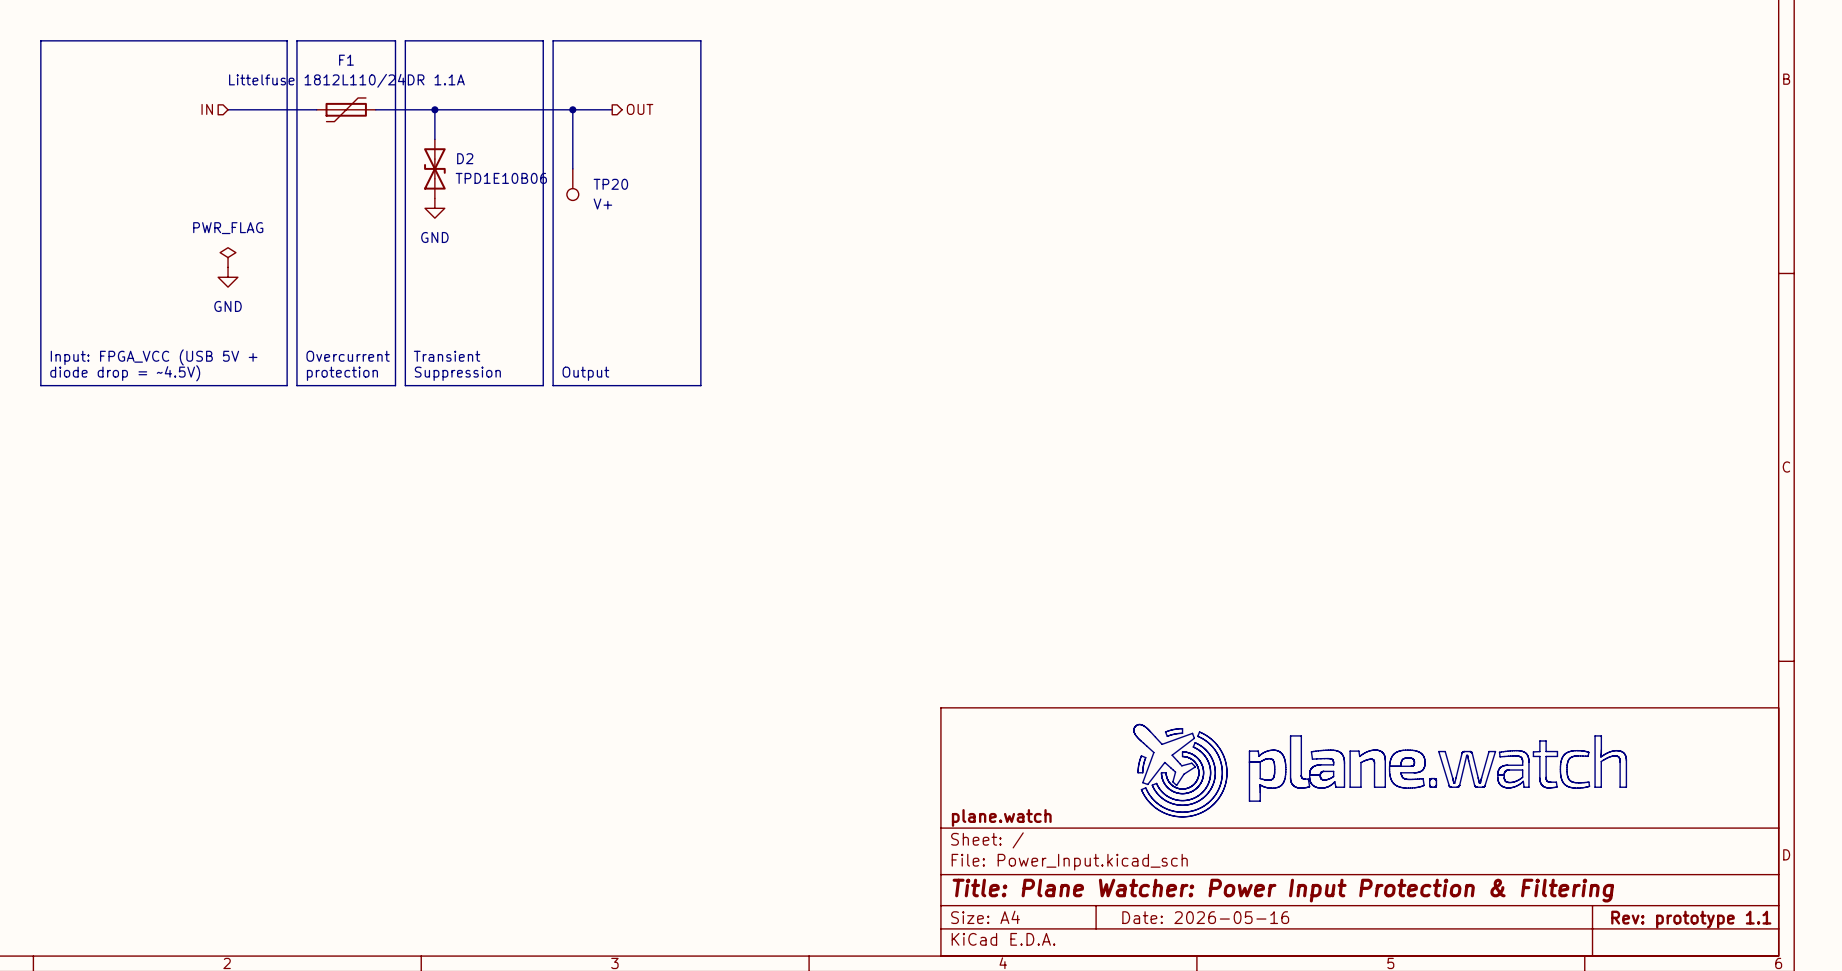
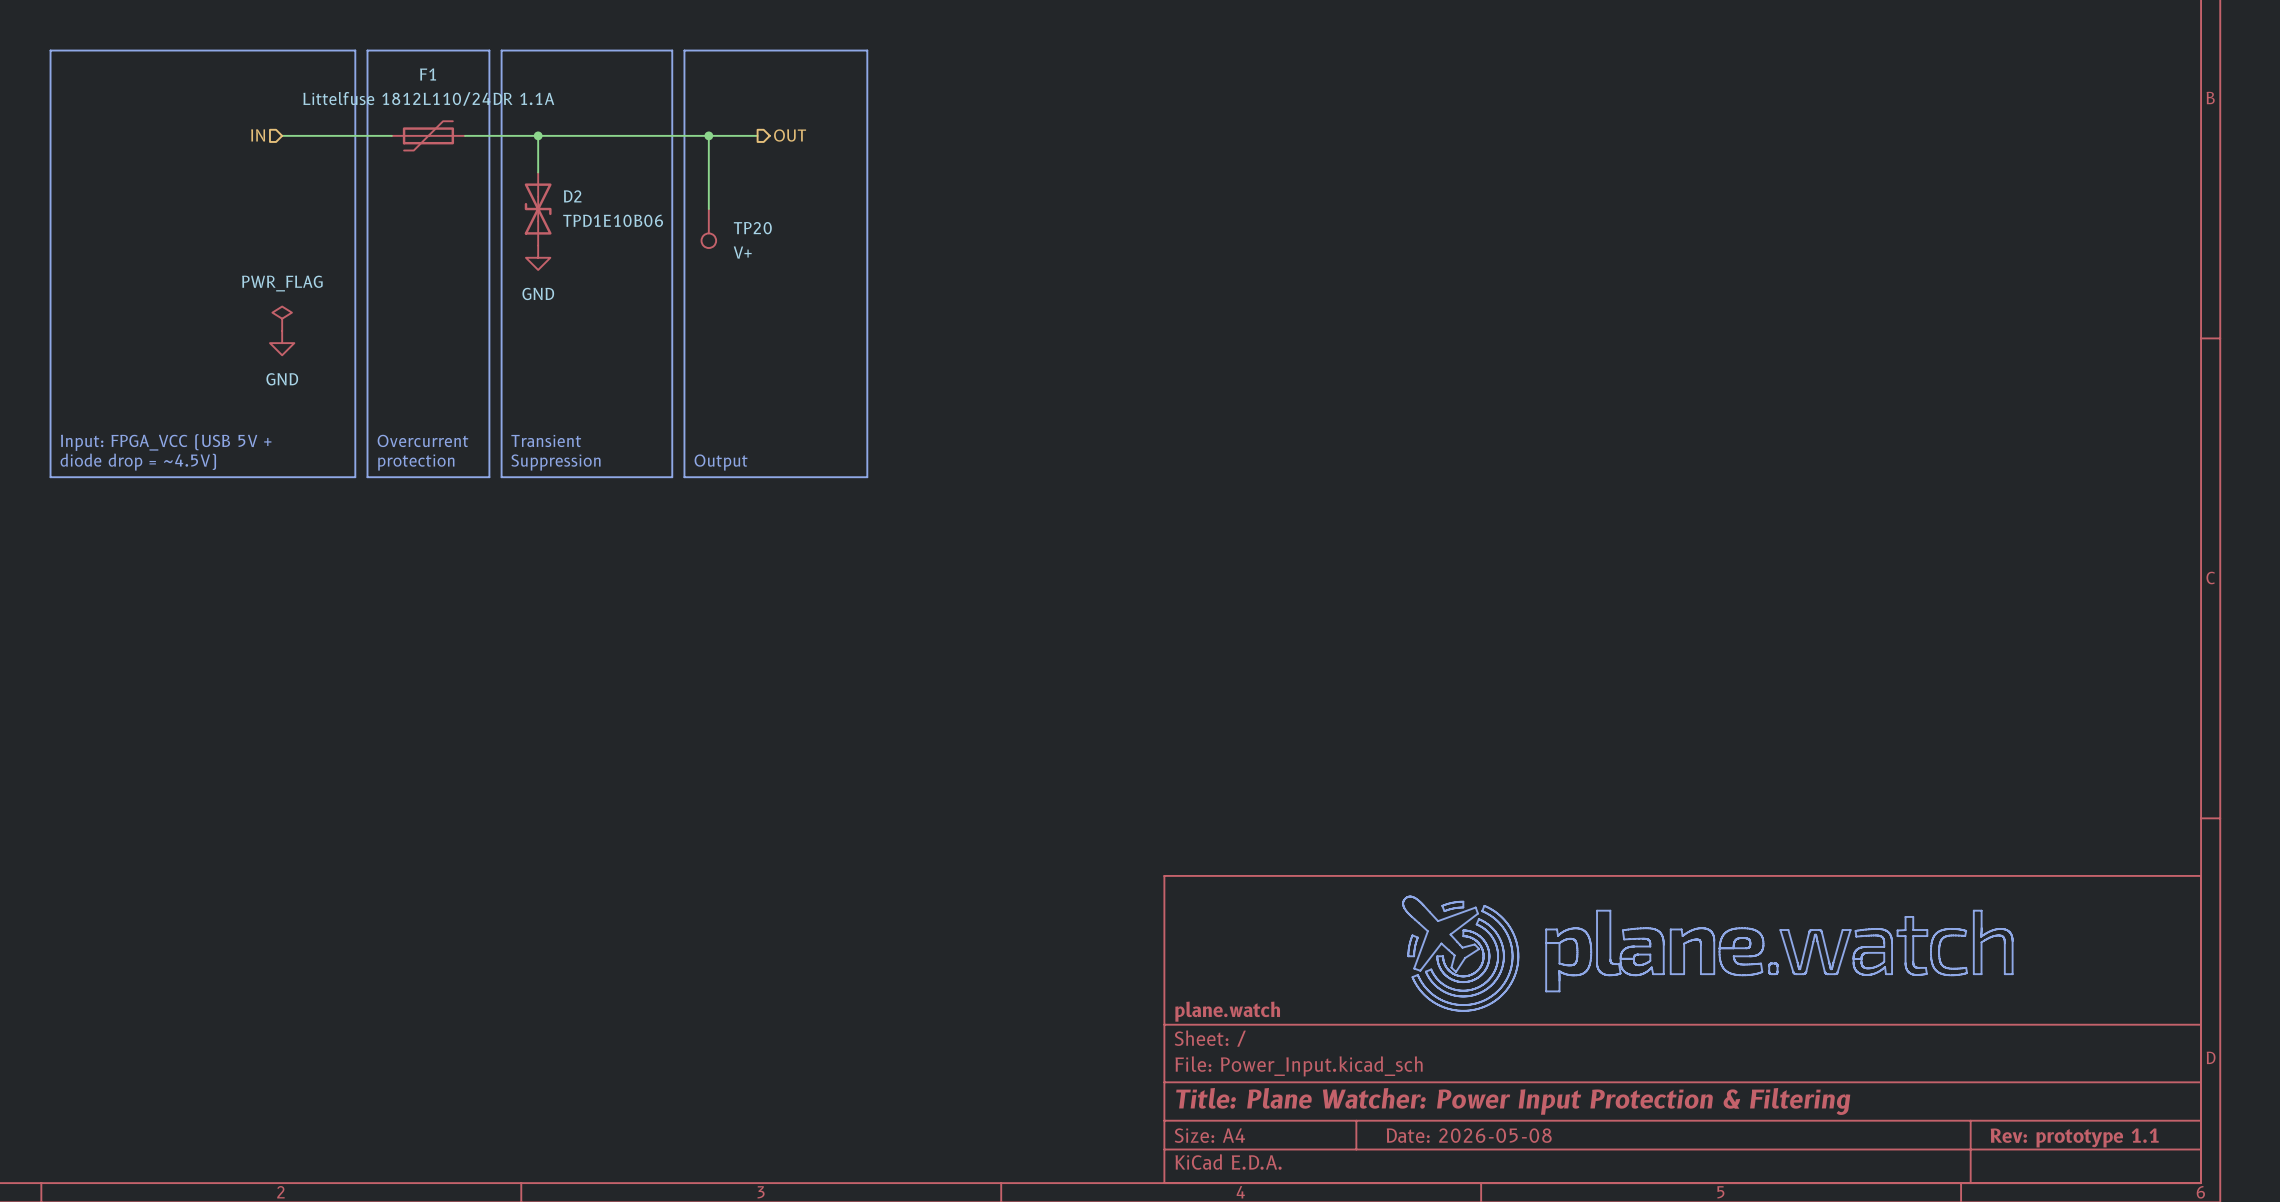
title block: Date: 2026-05-16 (1205, 917) -> Date: 2026-05-08 (1469, 1135)

